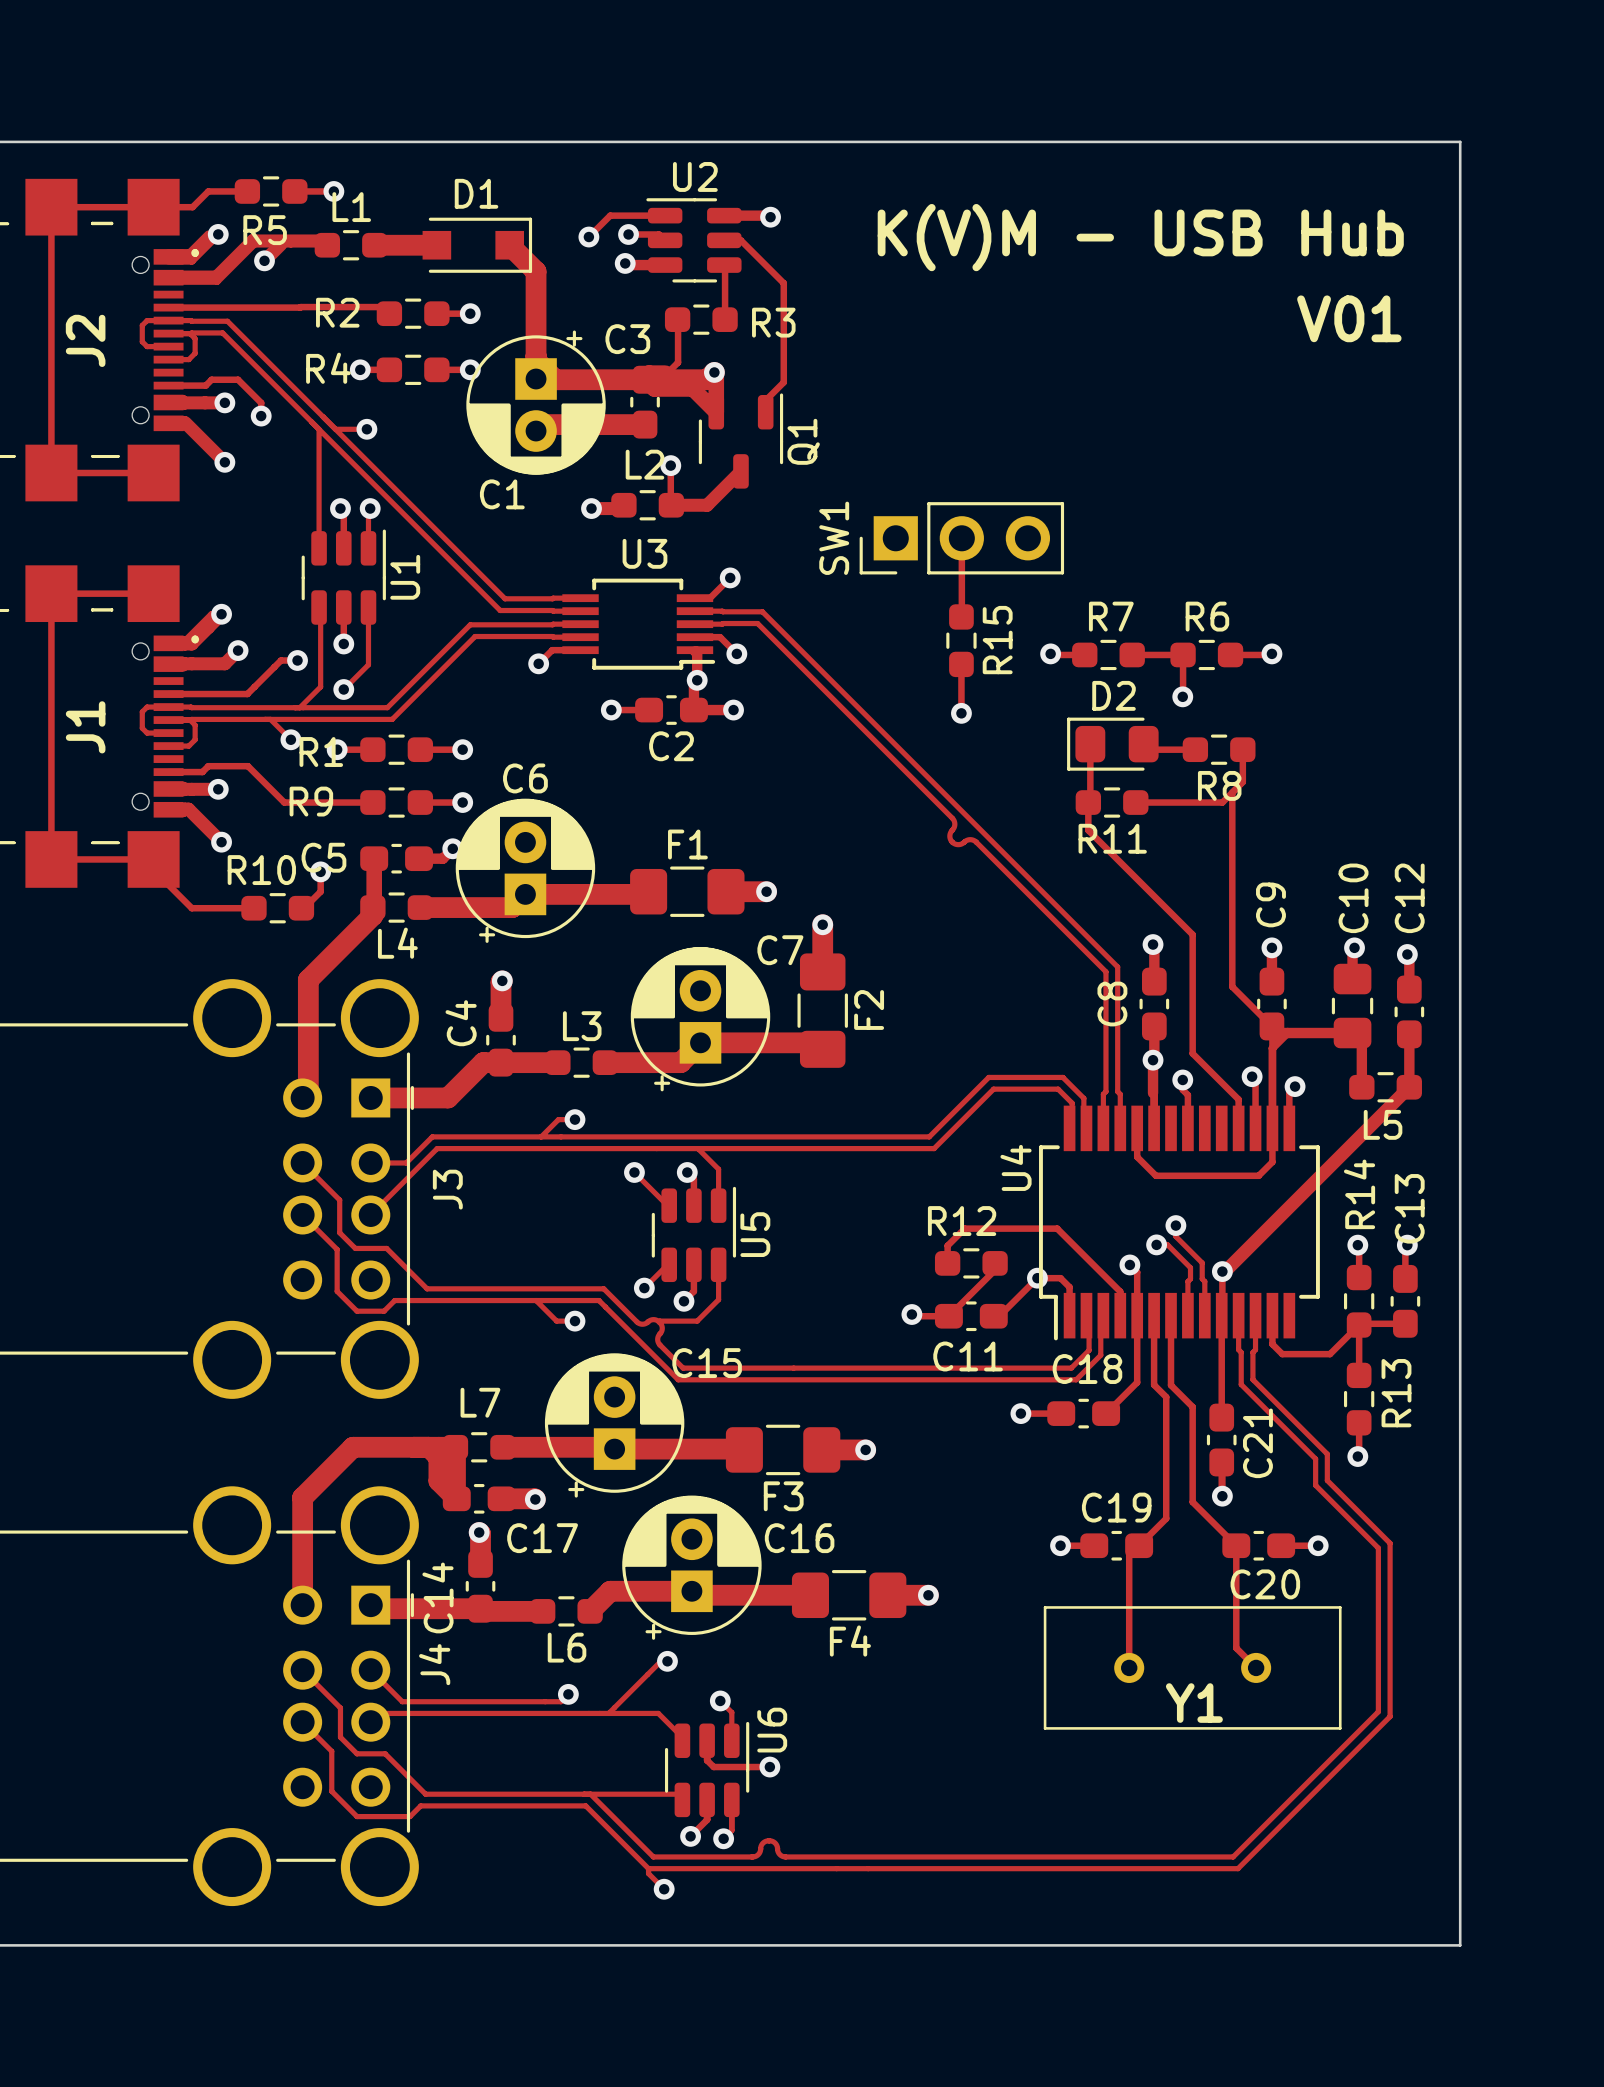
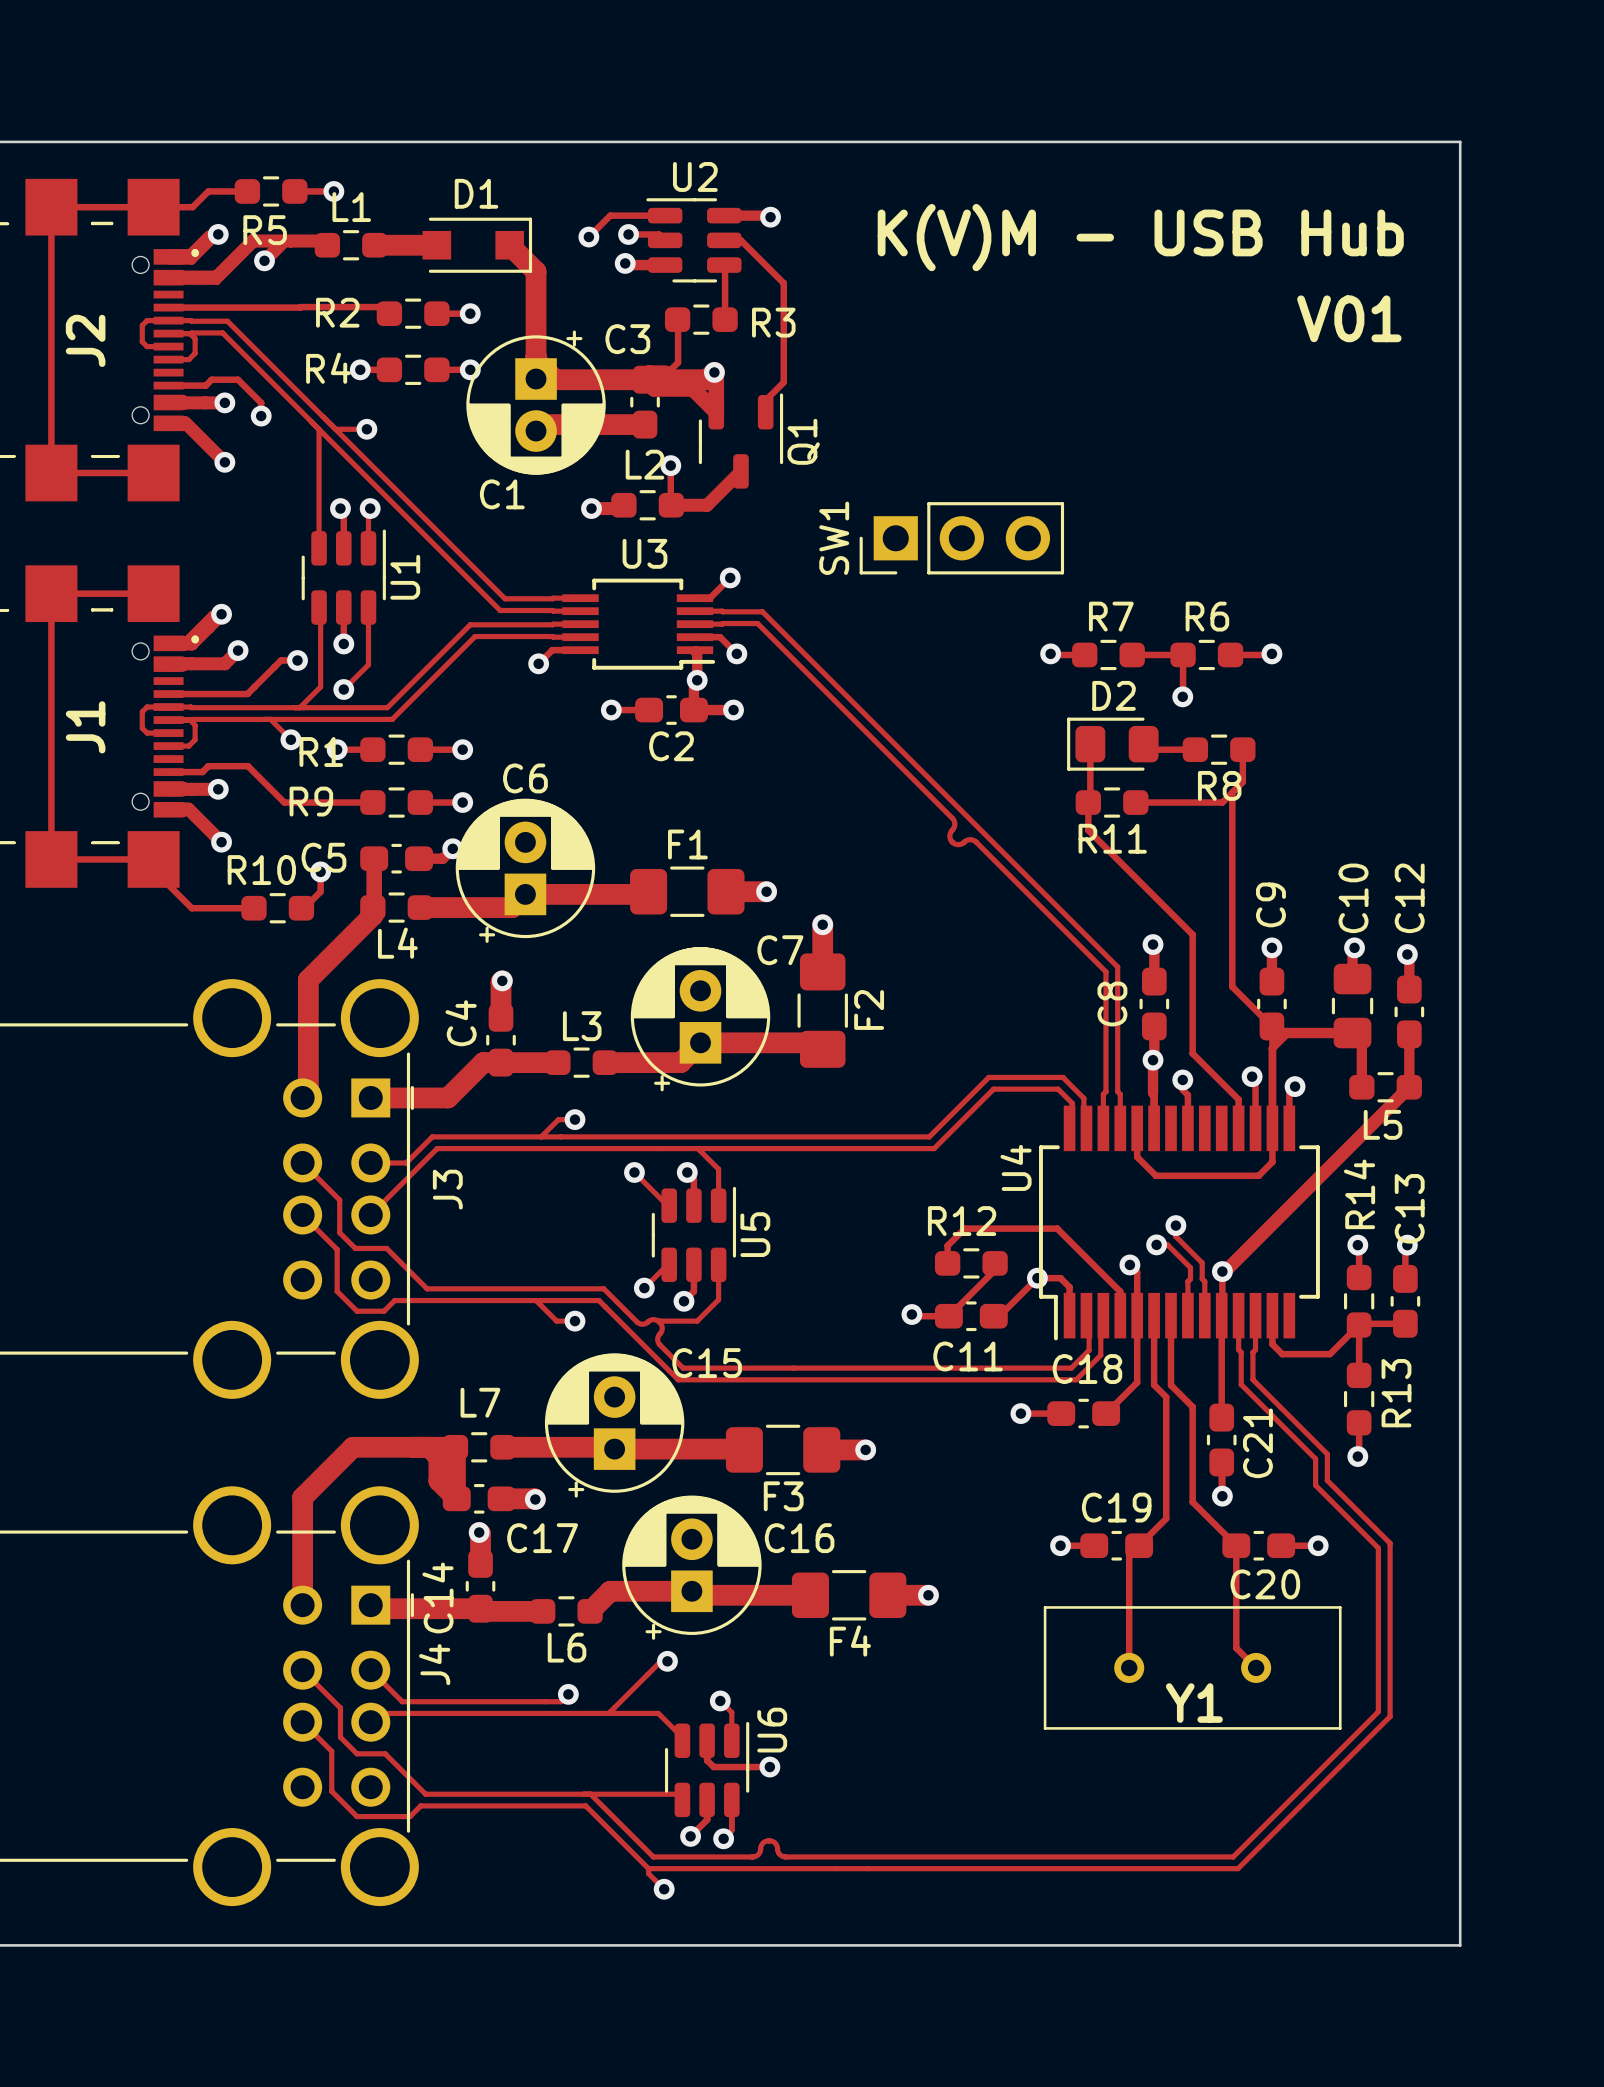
track: (961, 538) (961, 616) -> none
R15: (961, 640) -> none
track: (961, 664) (961, 713) -> none
via: (961, 713) -> none

